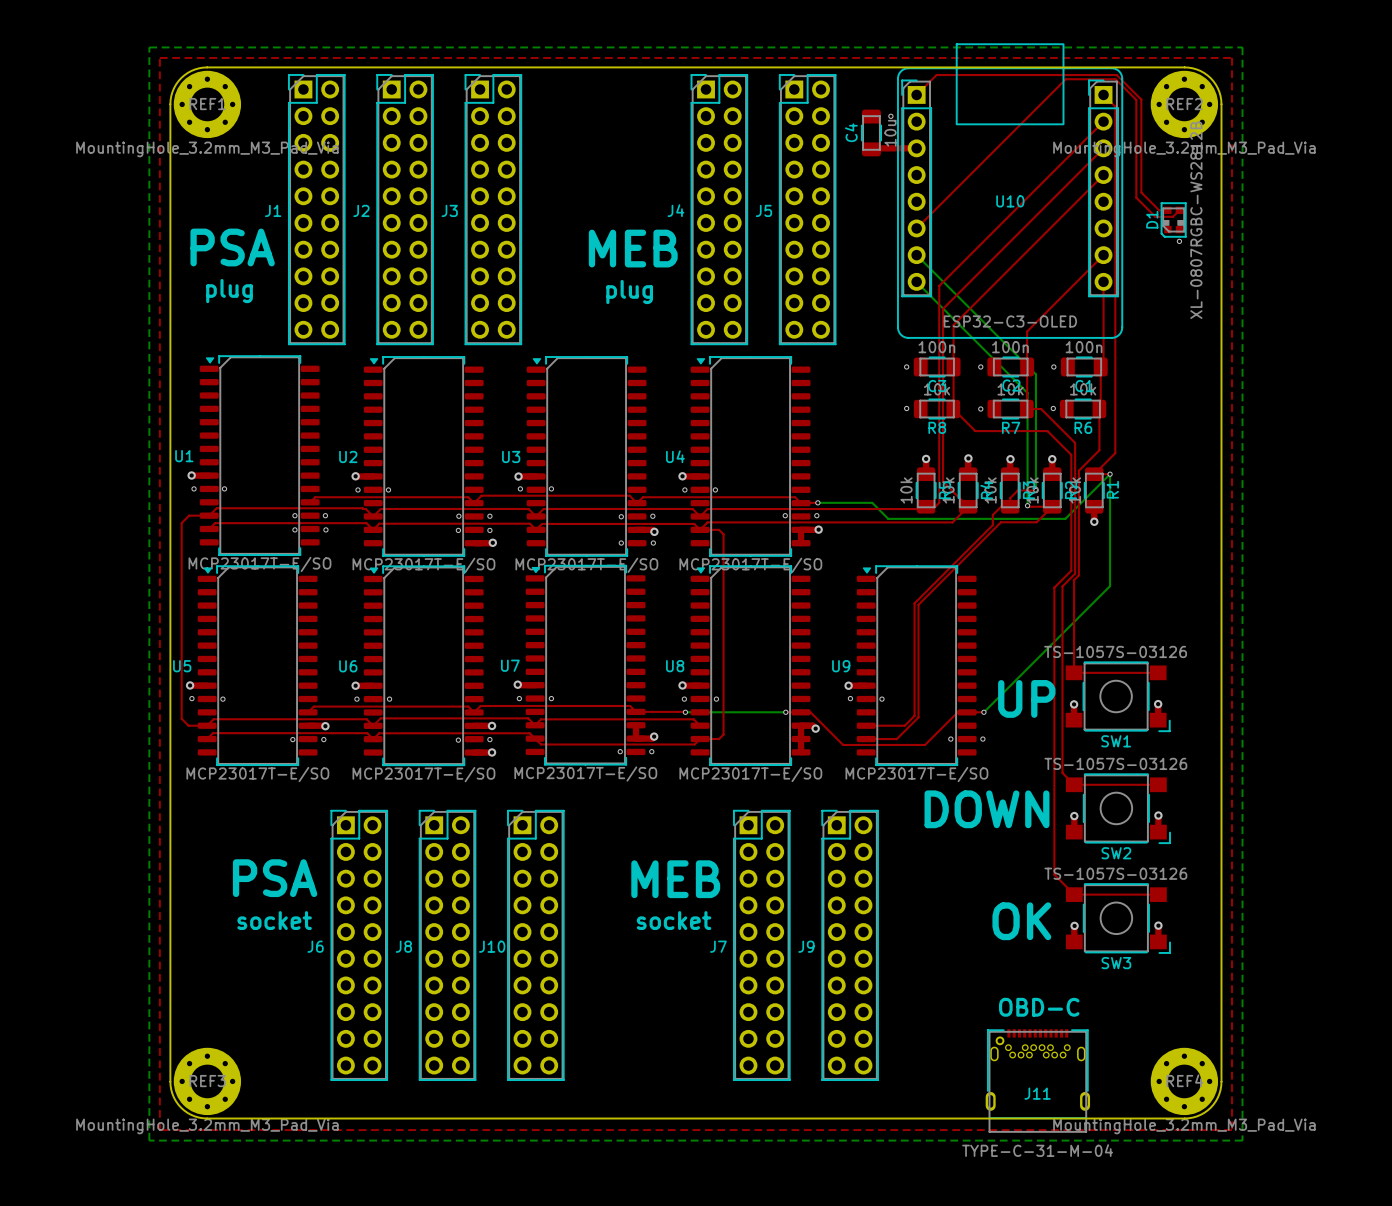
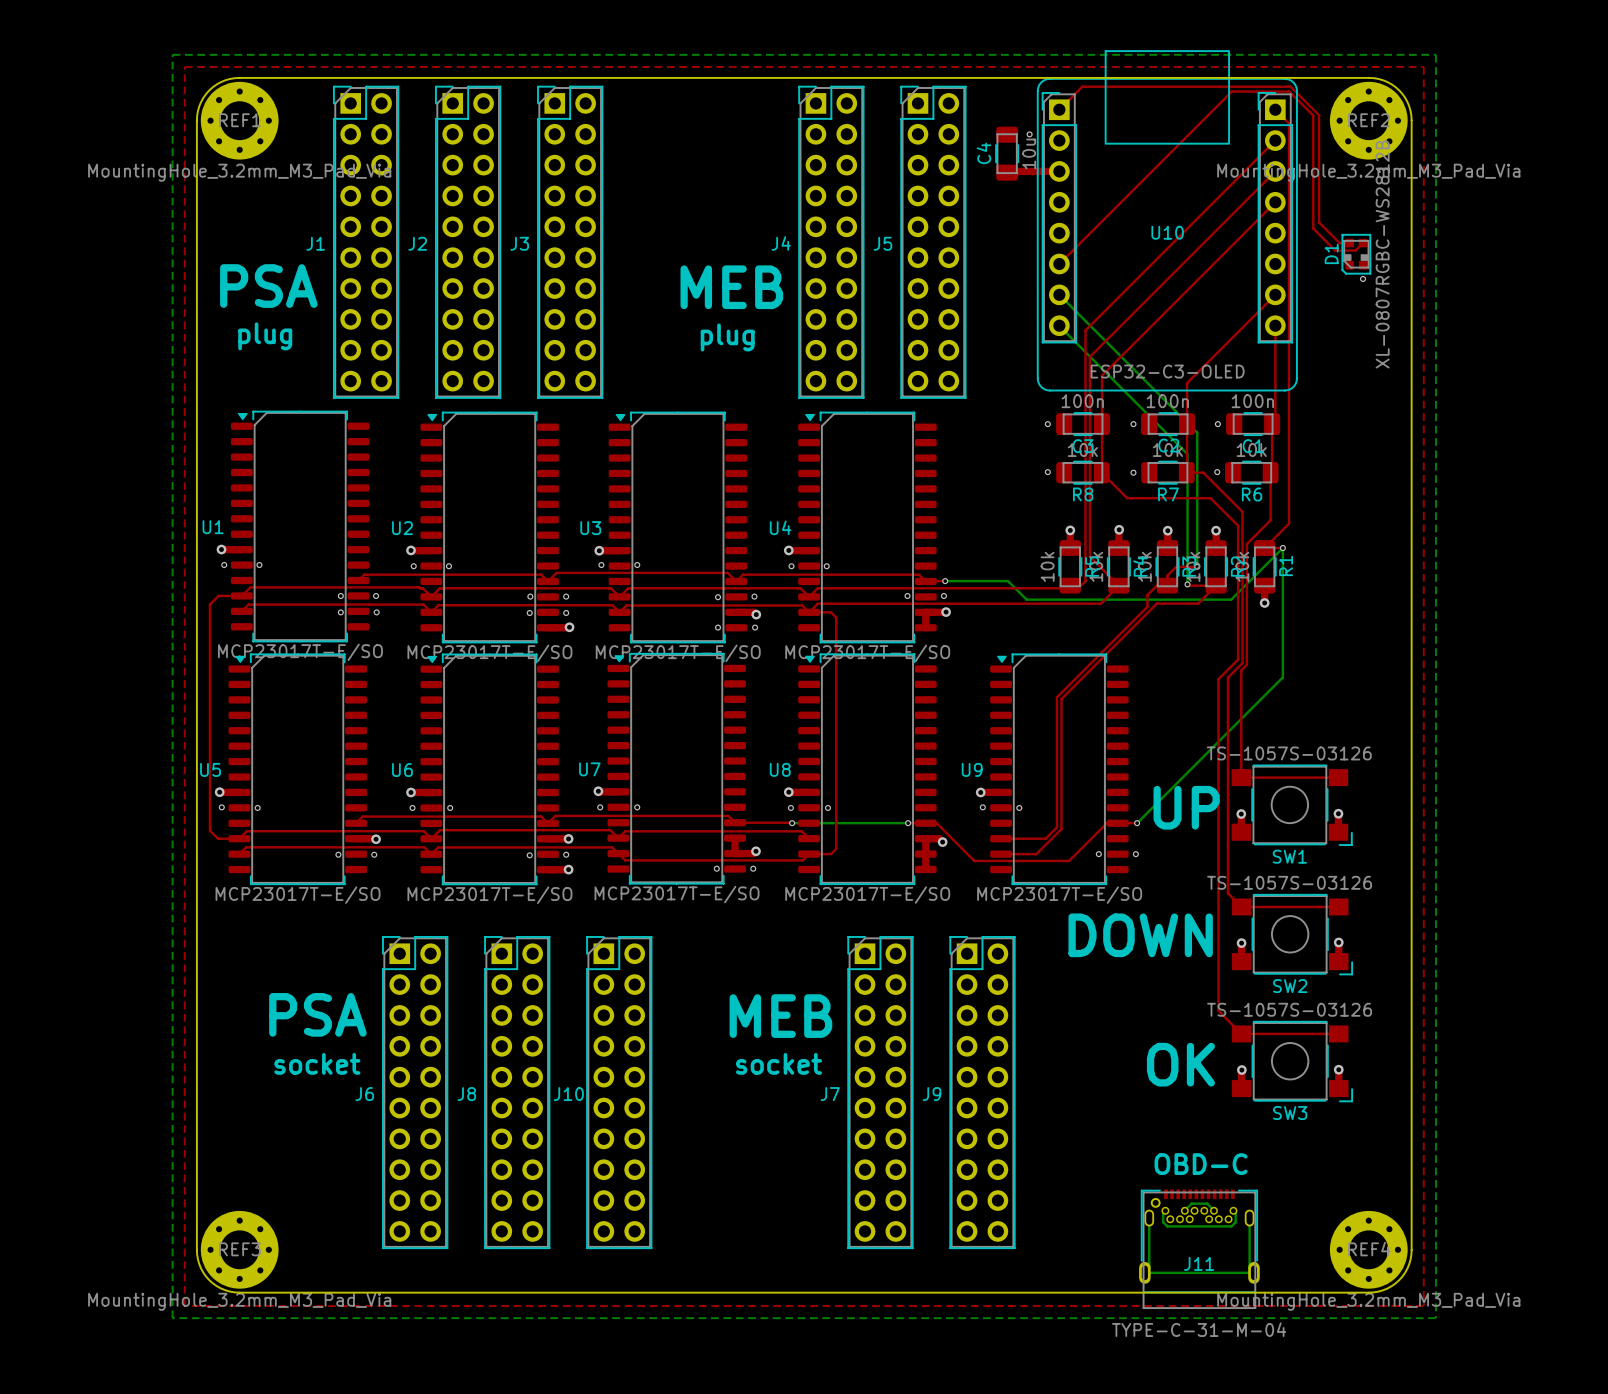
bottom track: none -> (1165, 1210) (1163, 1213) (1163, 1222) (1167, 1226) (1231, 1226) (1235, 1222) (1235, 1213) (1233, 1210)
bottom track: none -> (1184, 1210) (1191, 1203) (1207, 1203) (1214, 1210)
bottom track: none -> (1149, 1218) (1149, 1268) (1144, 1272) (1253, 1272) (1249, 1268) (1249, 1218)

